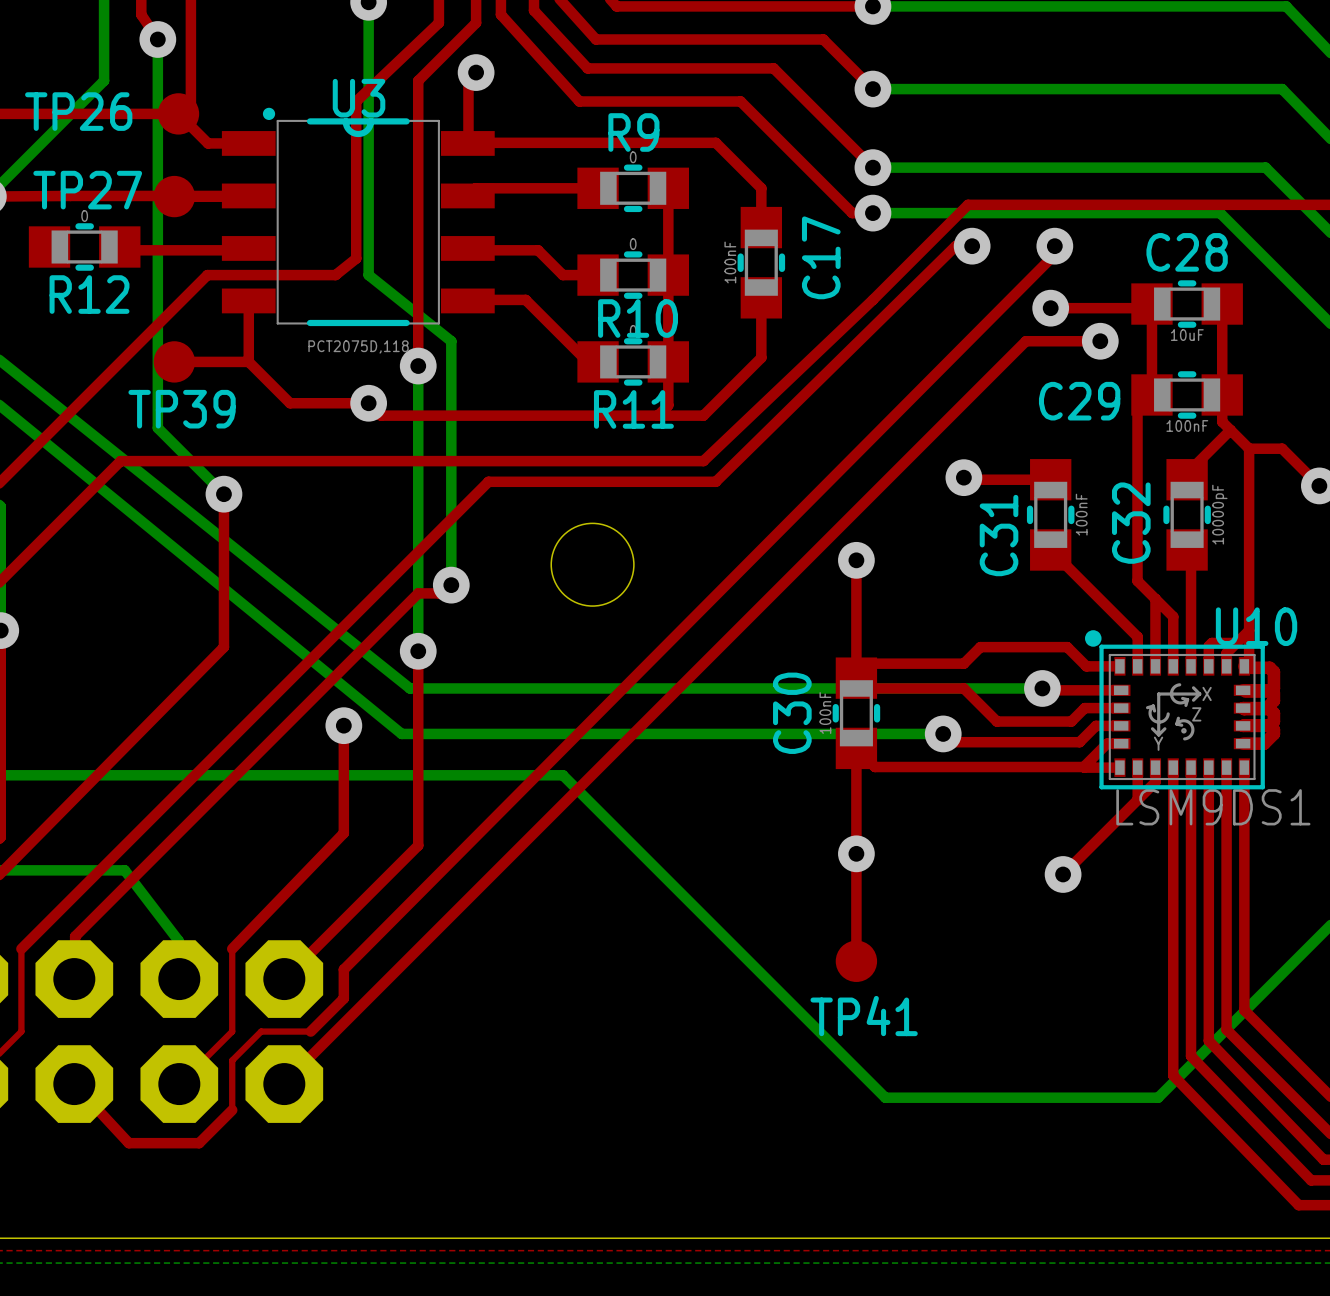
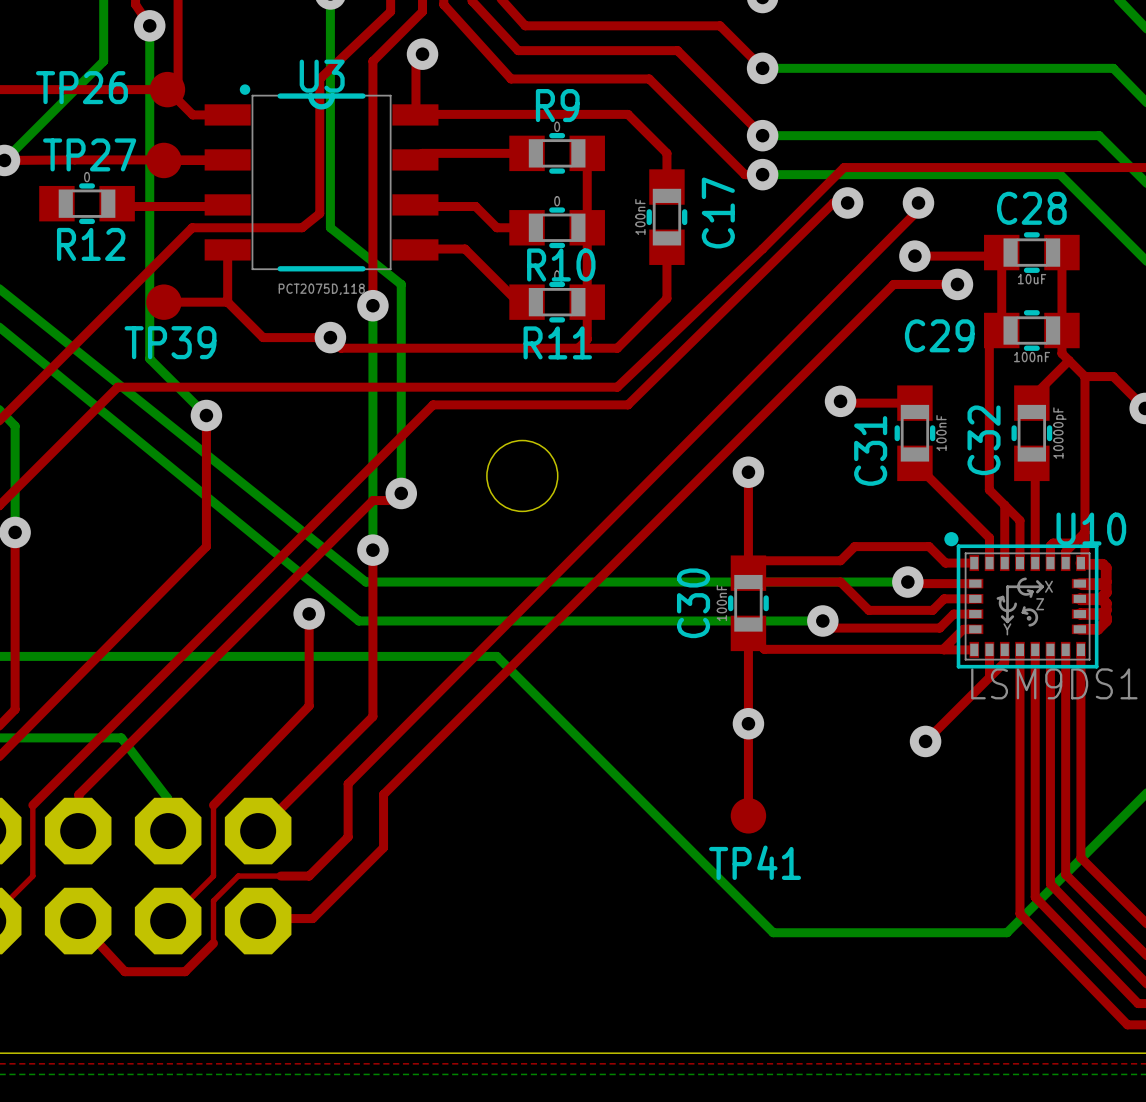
top track: (1054, 254) (343, 969) (343, 998) (310, 1031) -> (918, 210) (348, 783) (348, 837) (309, 876) (280, 876)
top track: (430, 936) (285, 1081) -> (383, 794) (383, 847) (312, 918) (259, 918)

